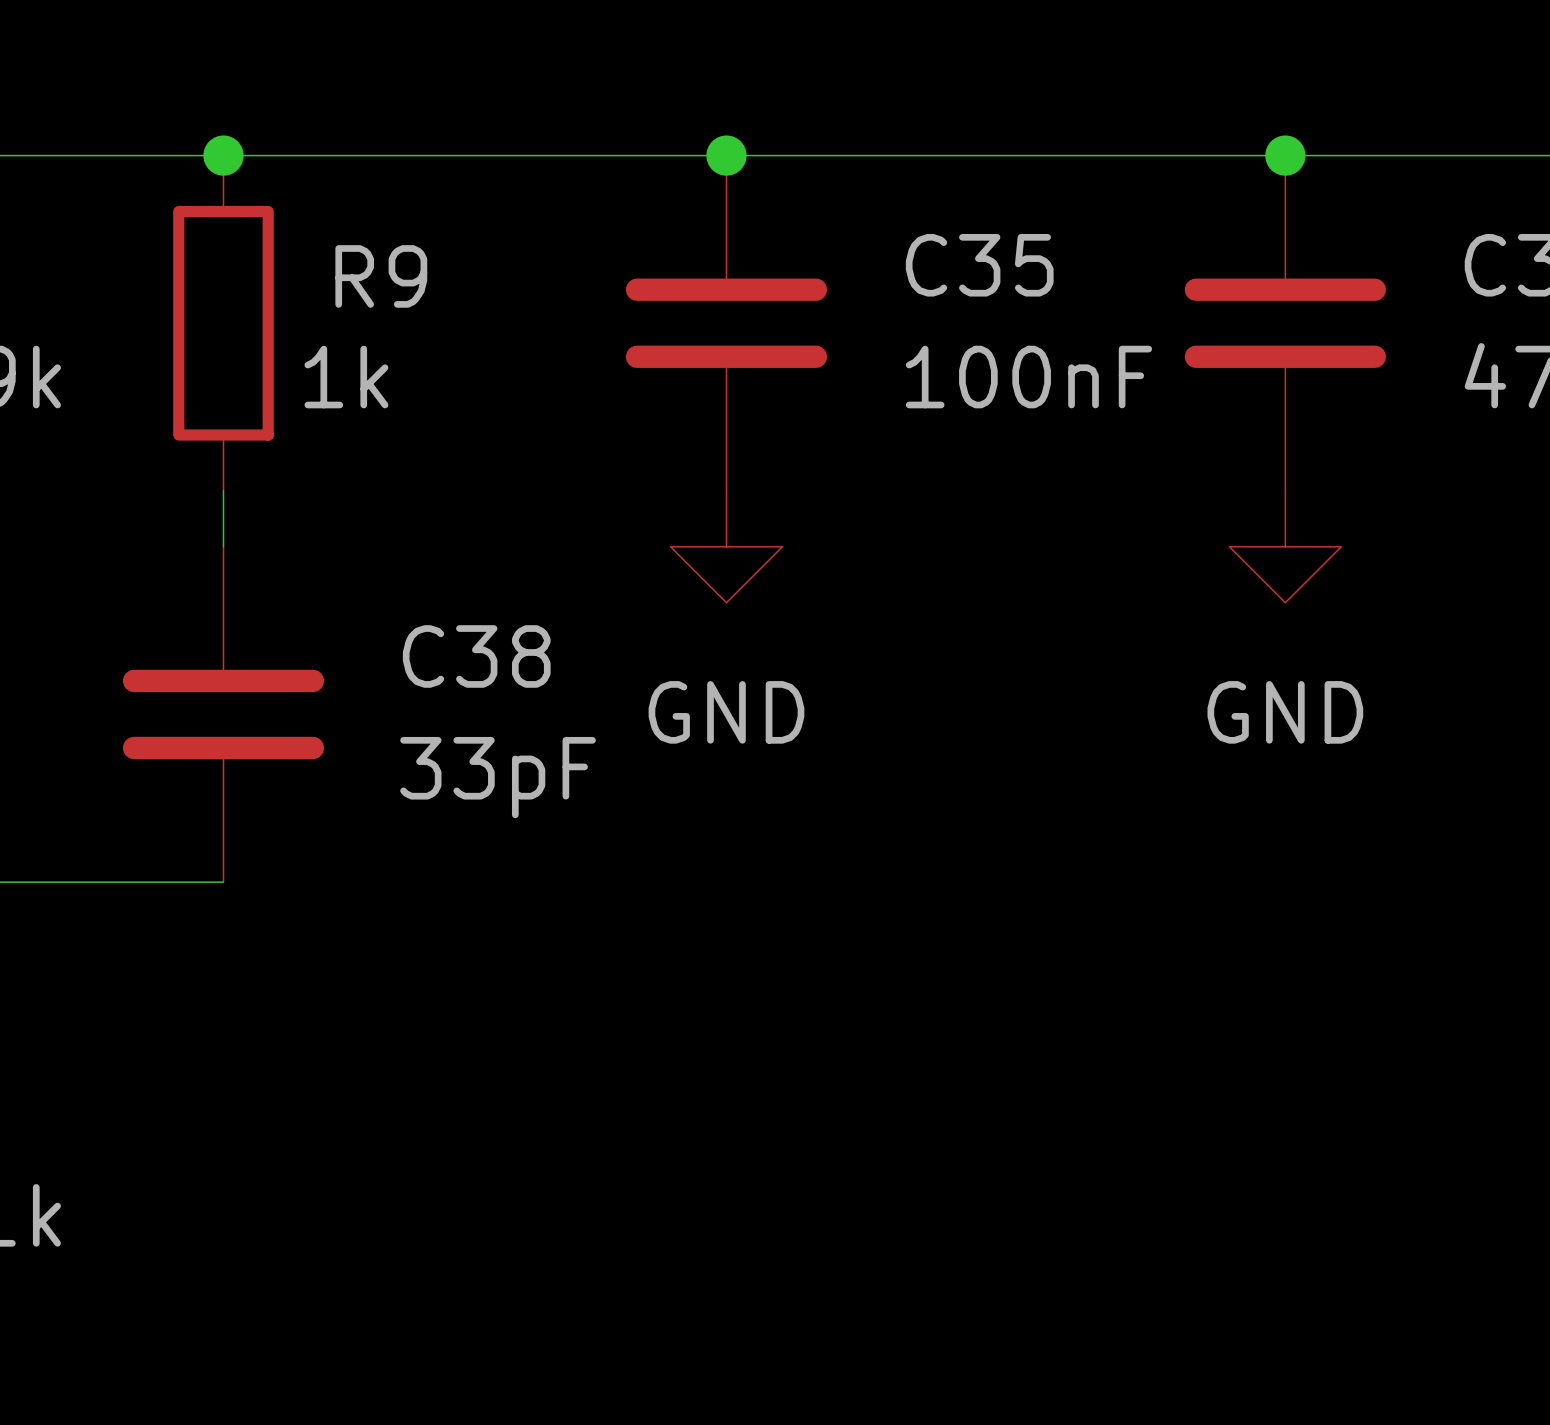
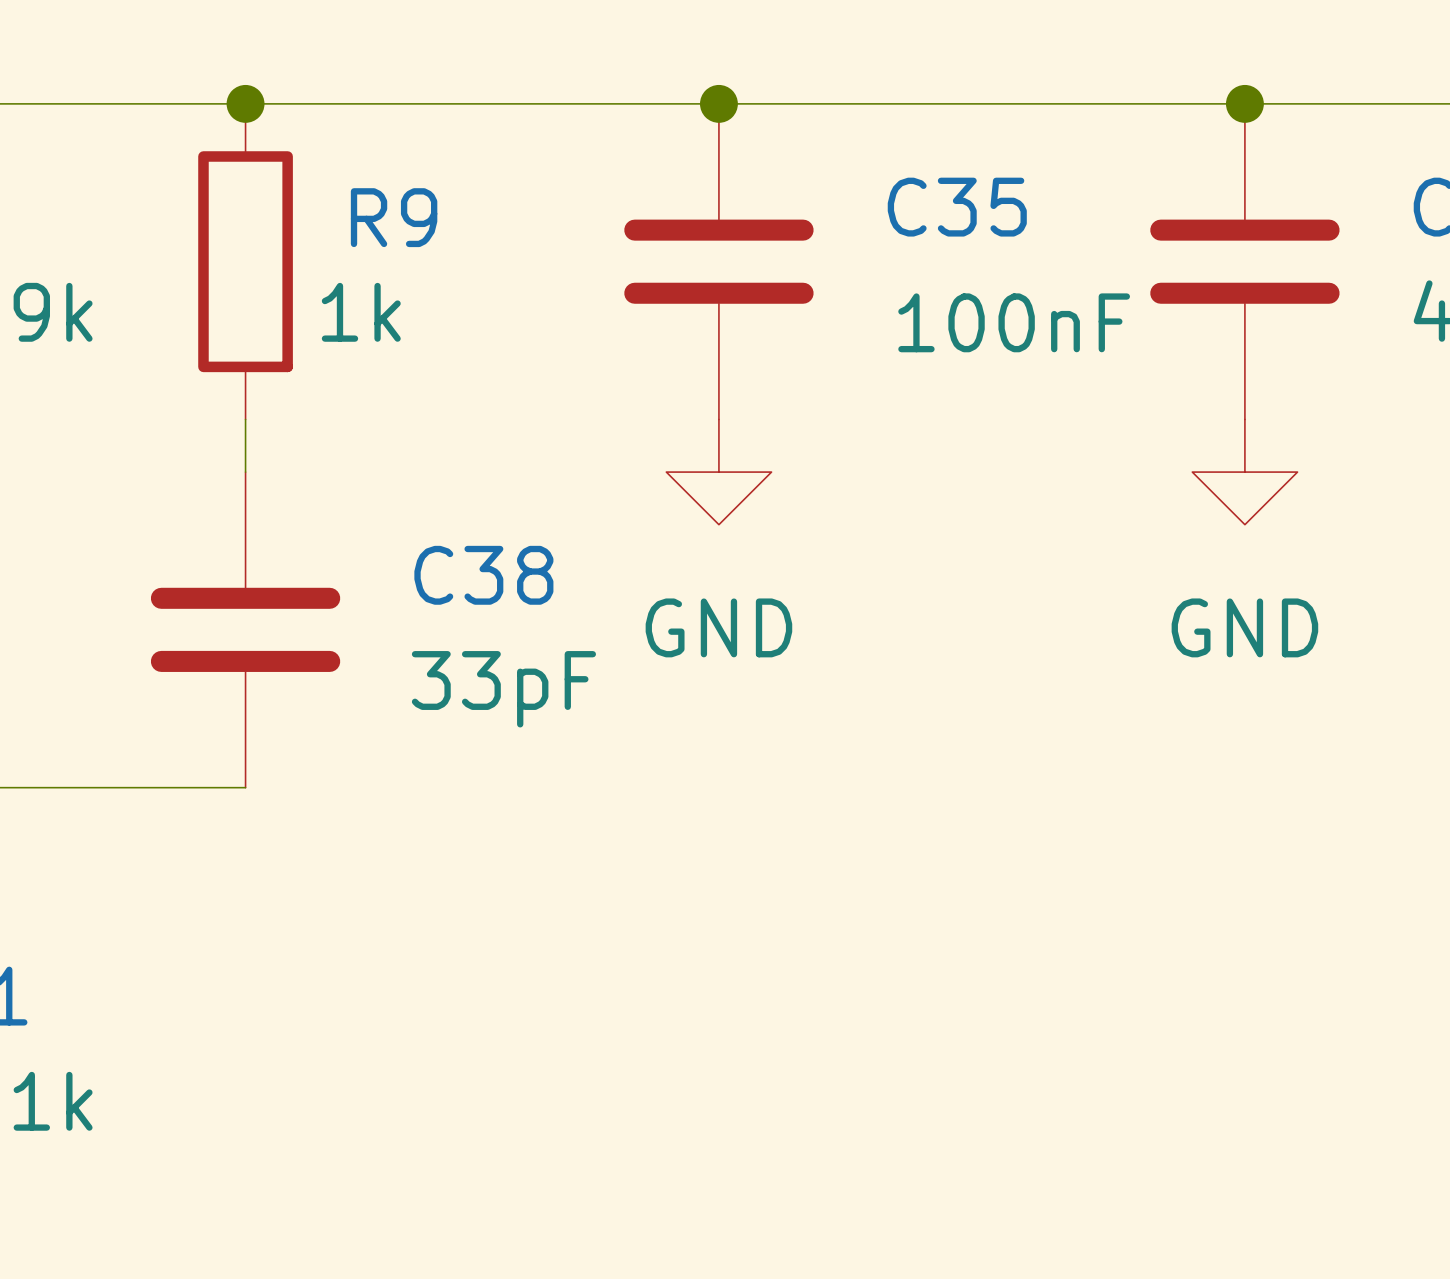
C35 value position: 100nF (1028, 377) -> 100nF (1014, 322)

